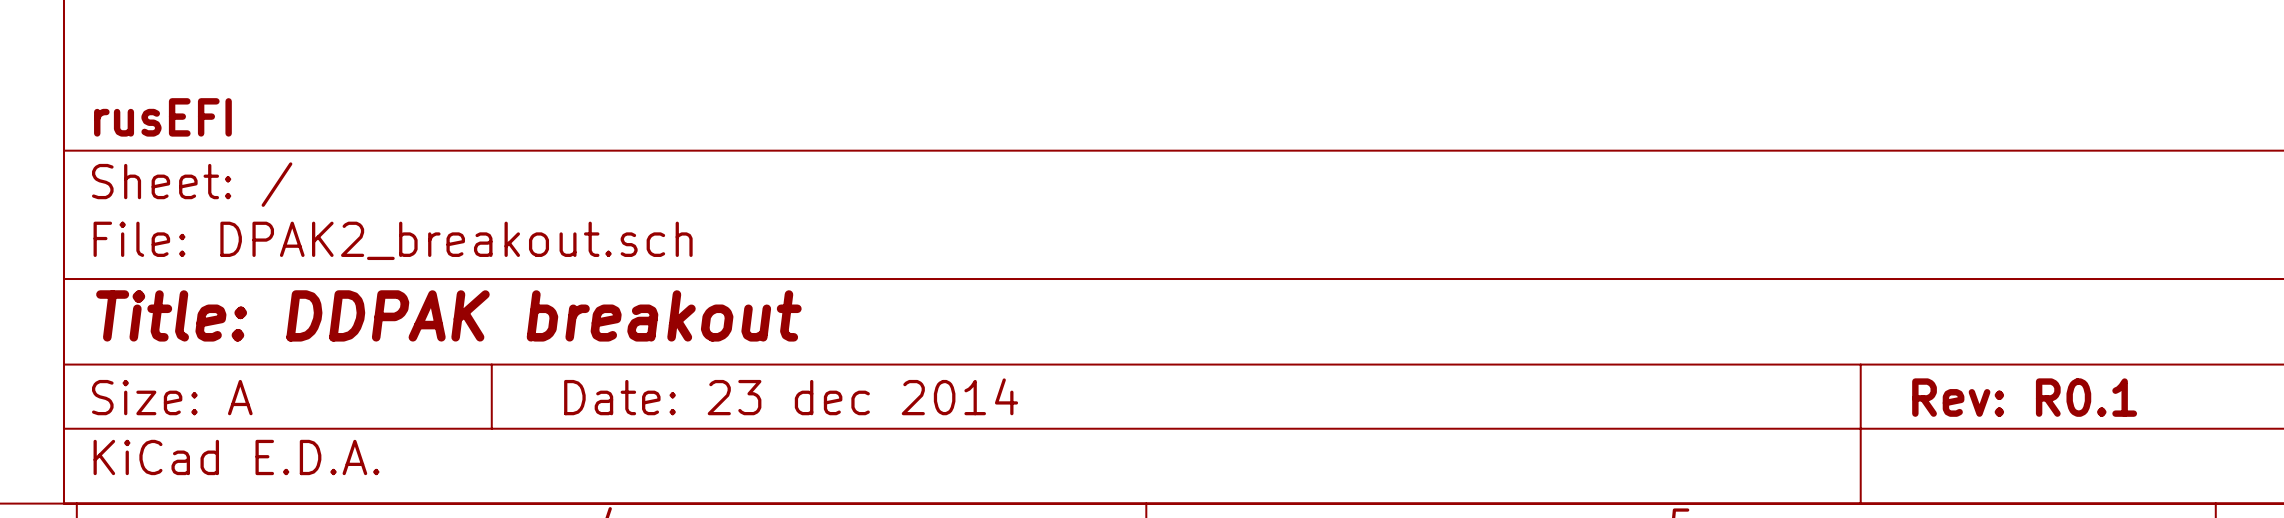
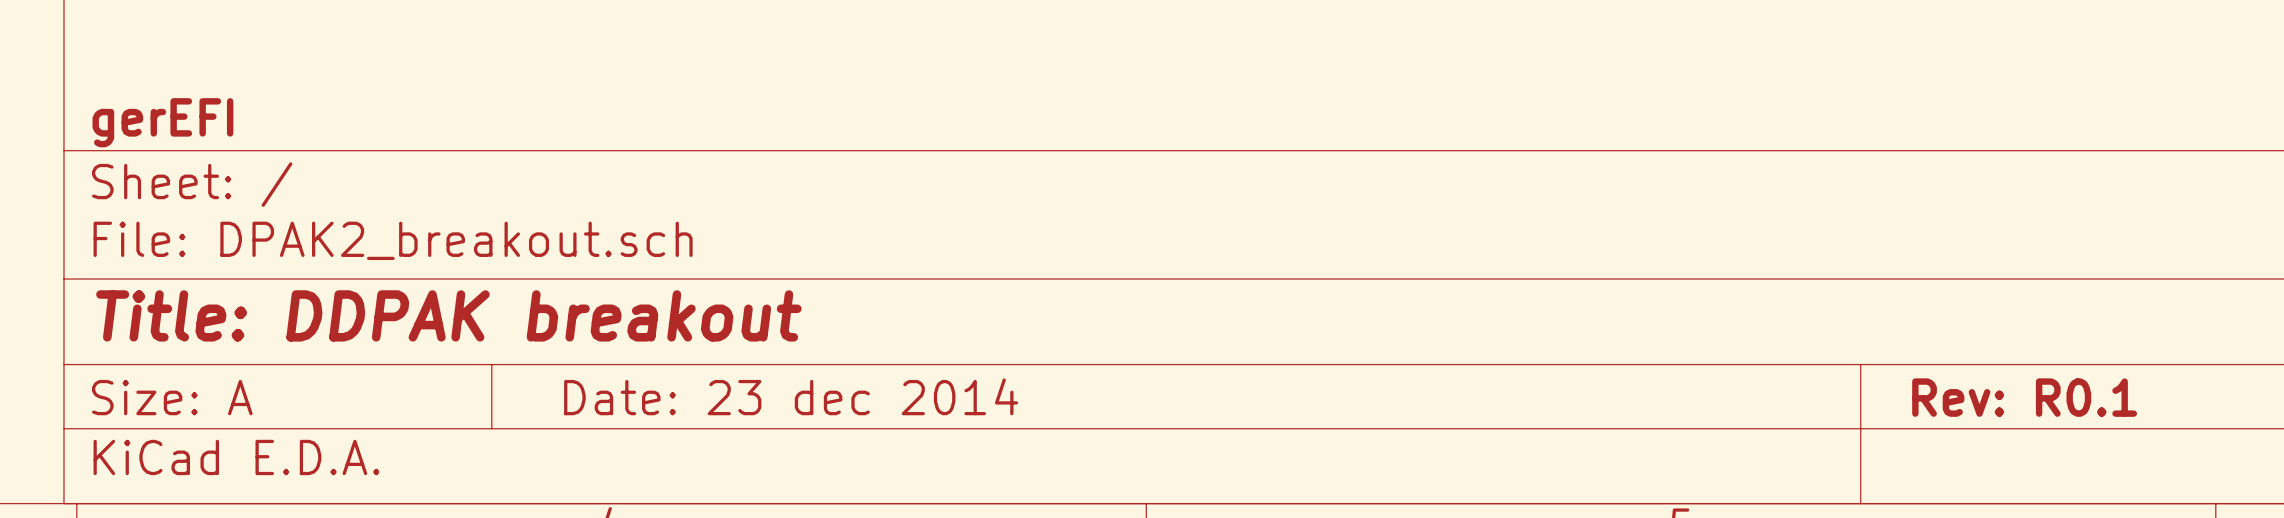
title block: rusEFI (162, 117) -> gerEFI (162, 122)

